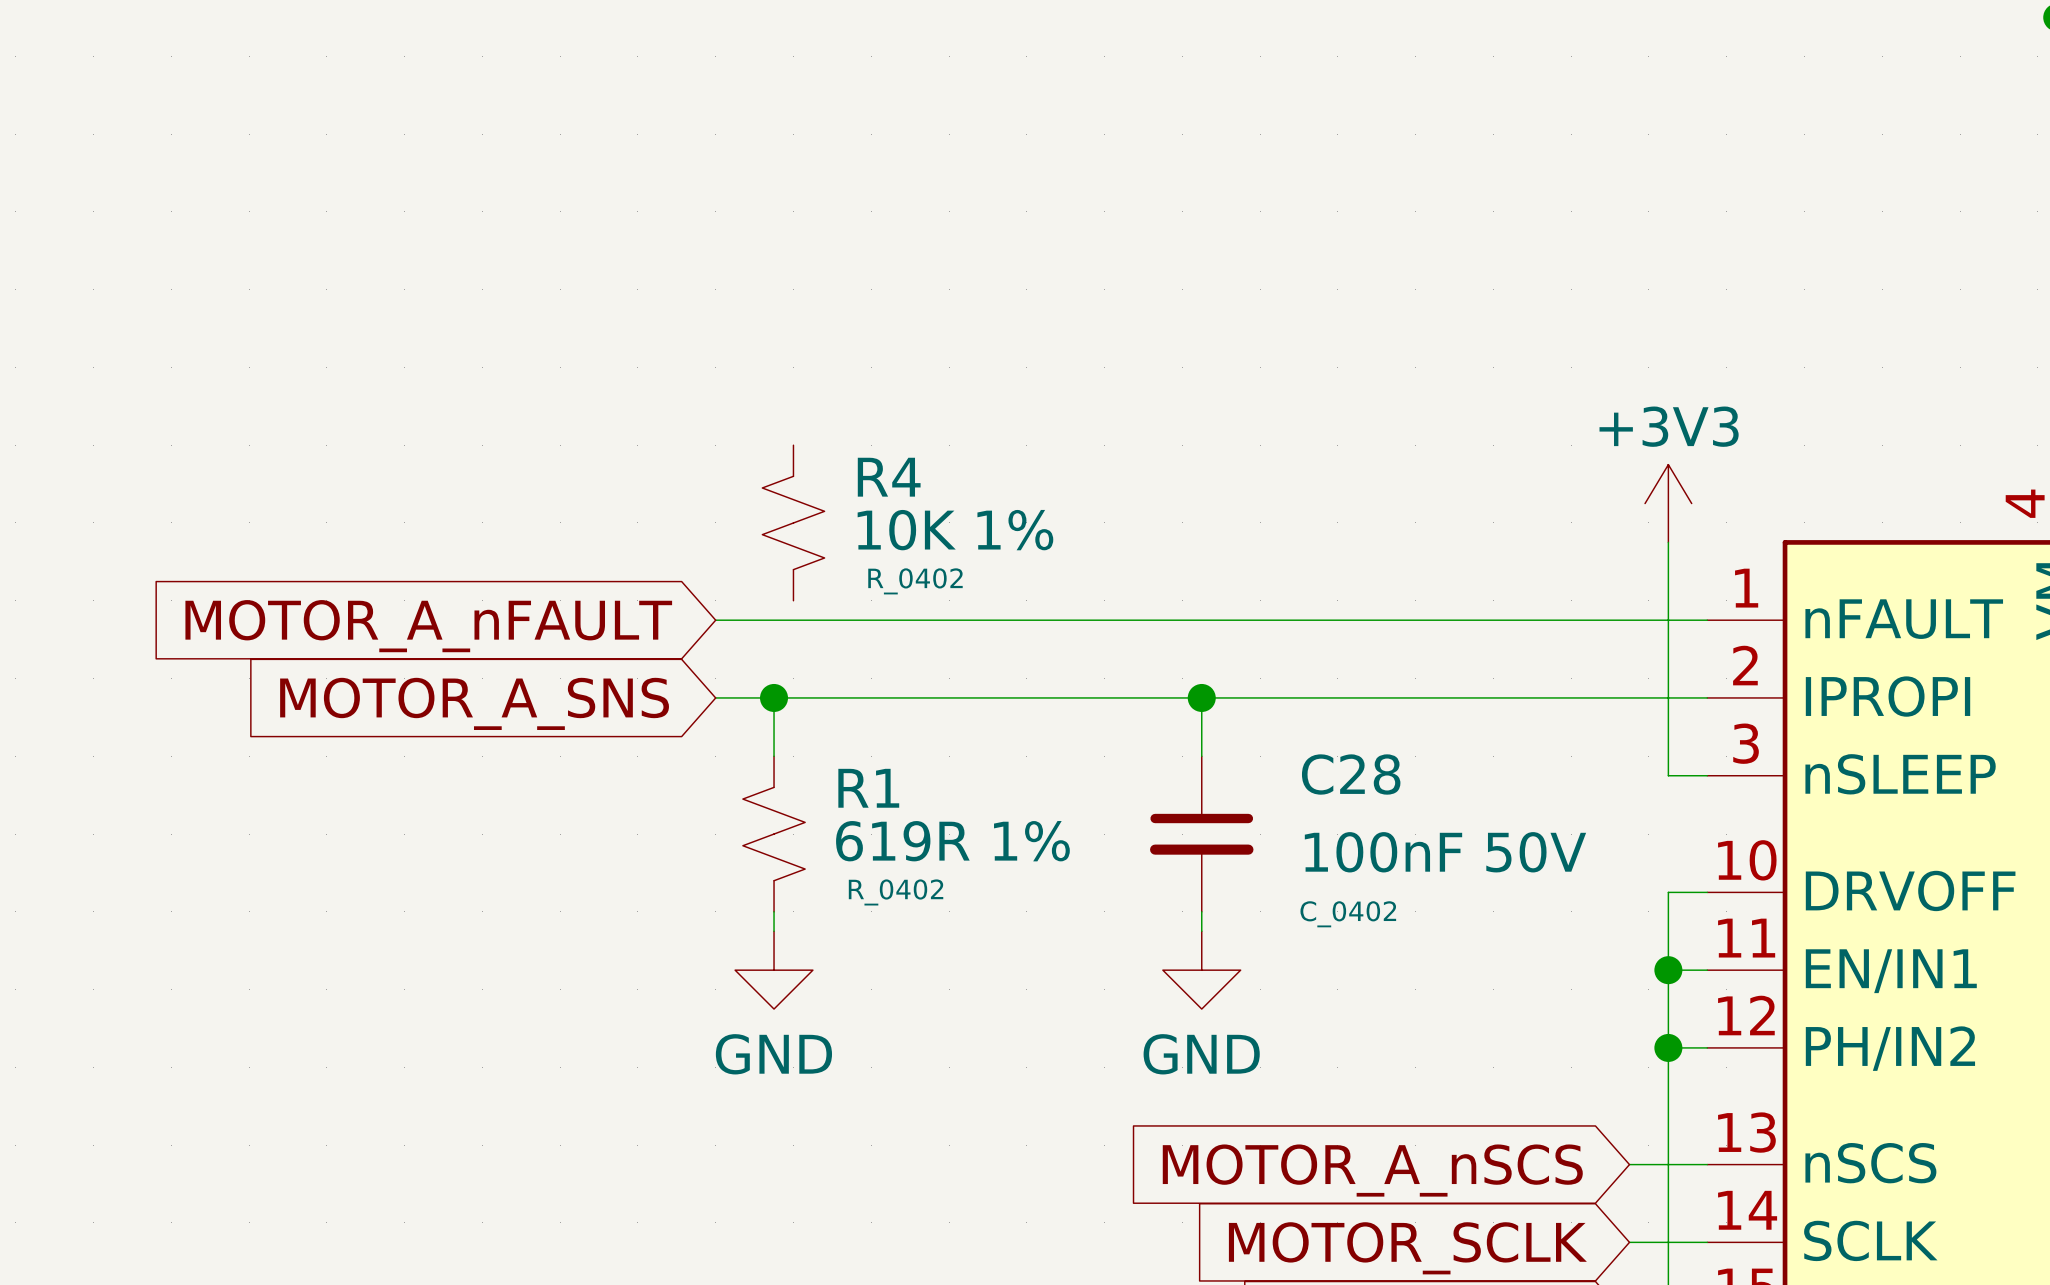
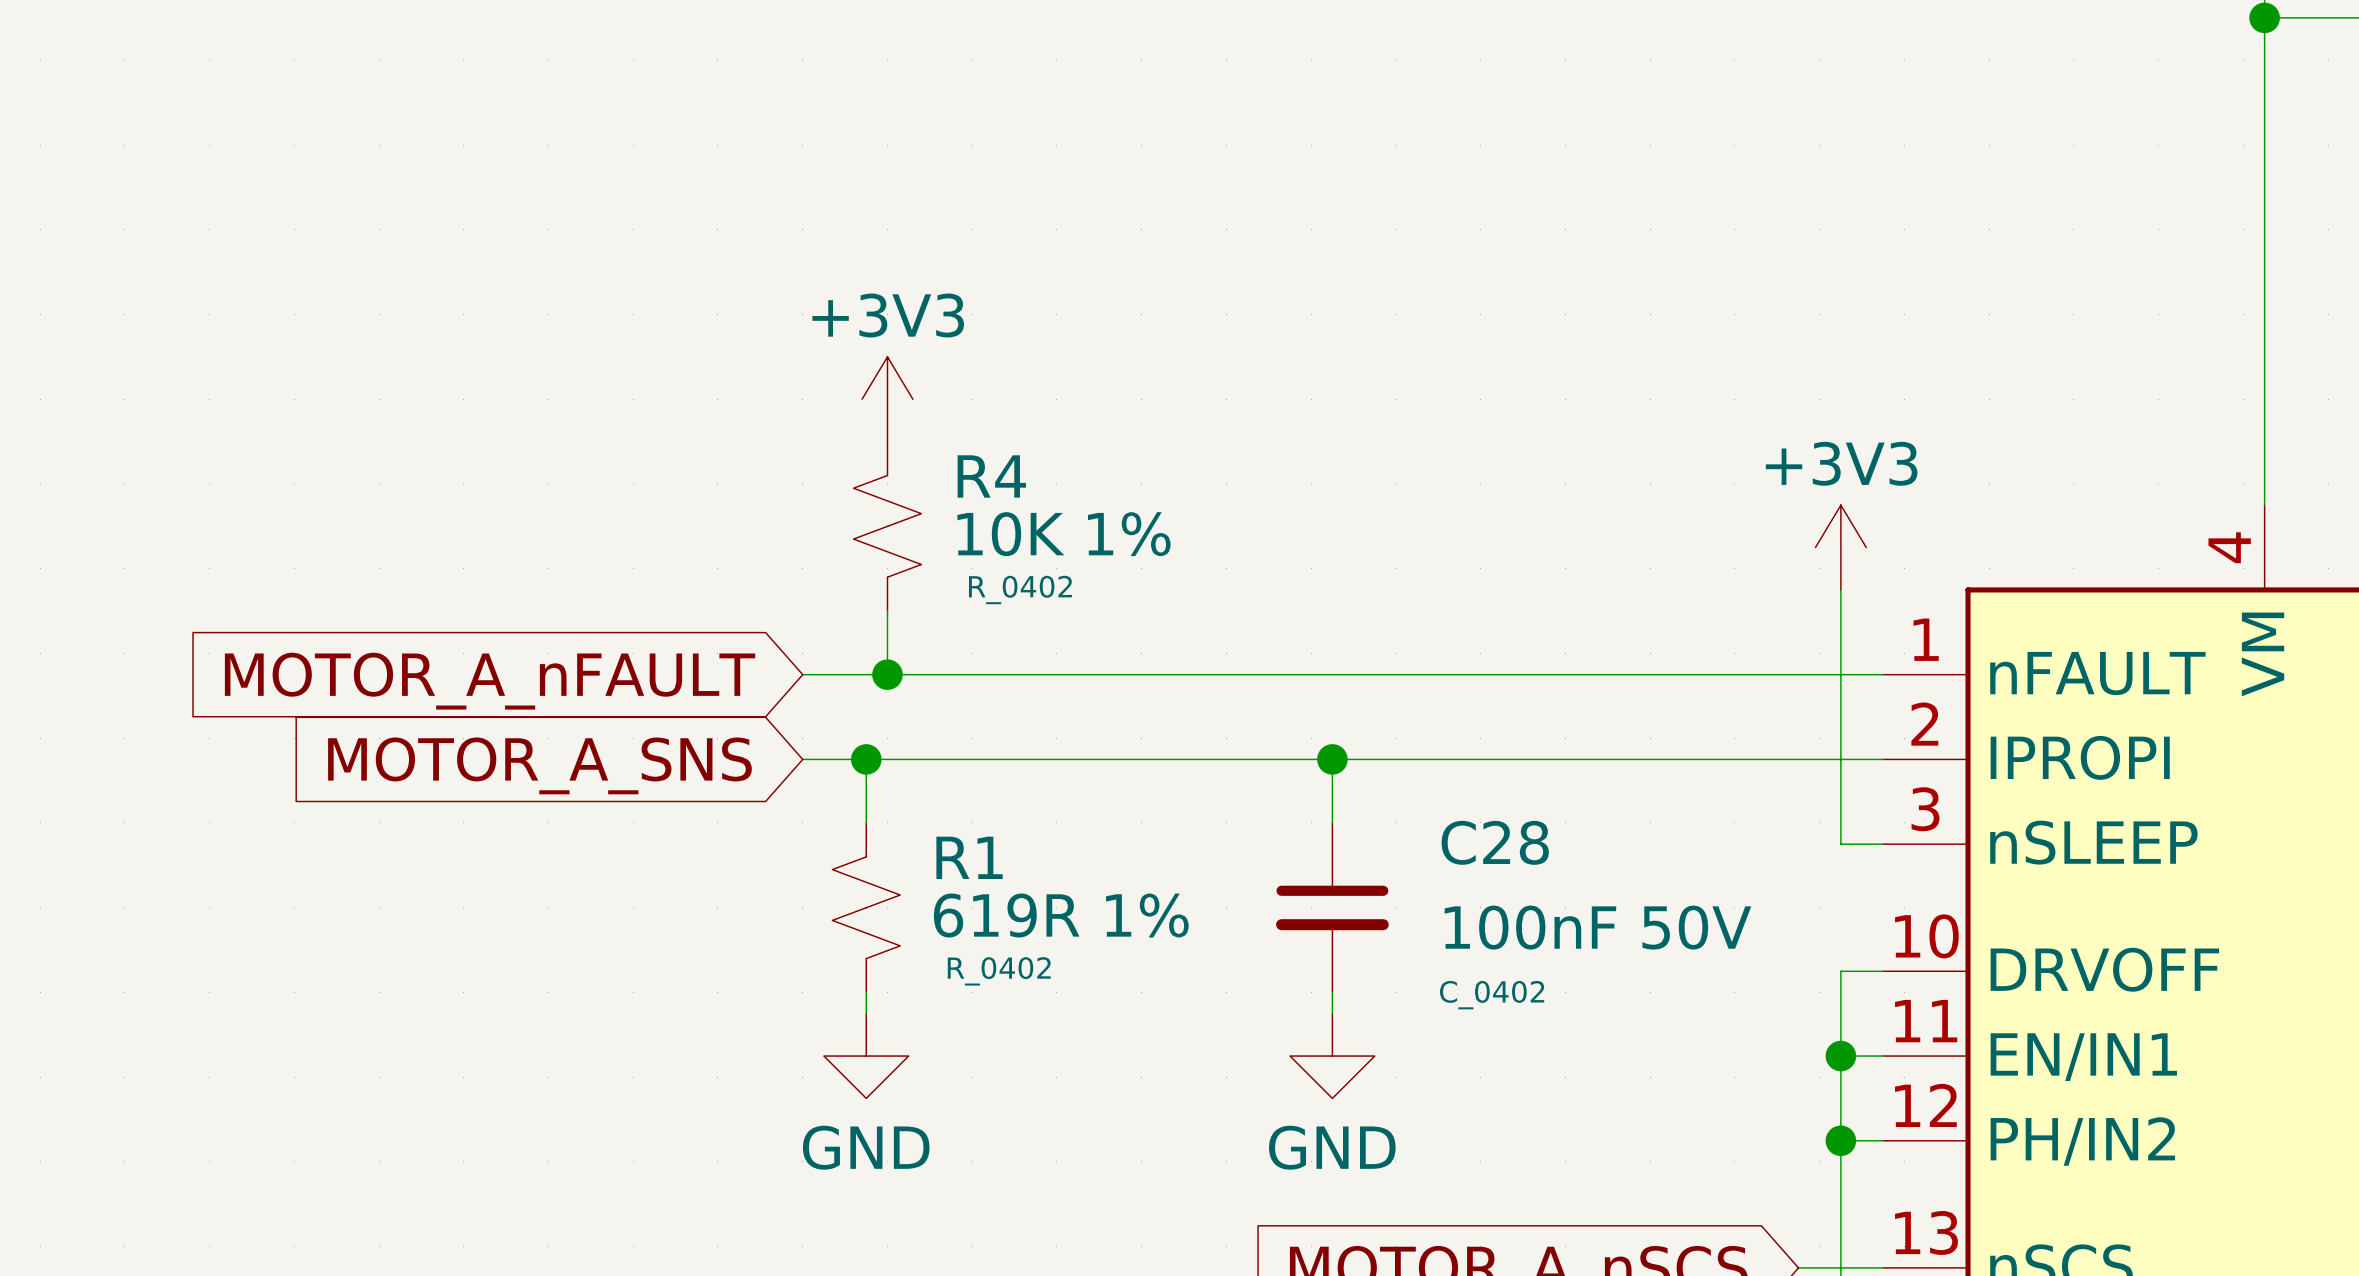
power symbol: none -> +3V3 (887, 399)
R4 position: (793, 522) -> (887, 526)
junction: none -> (887, 674)

